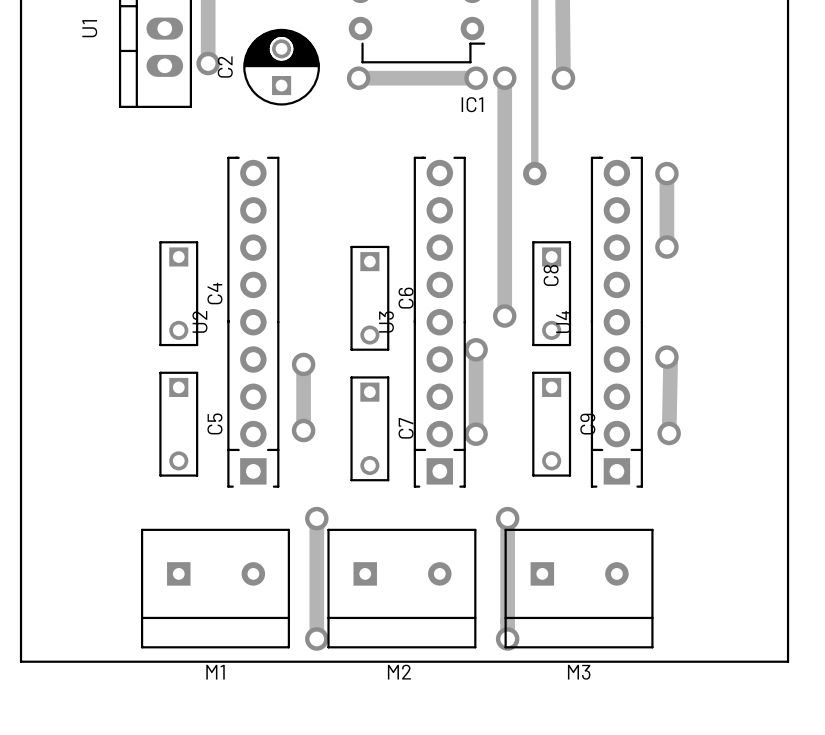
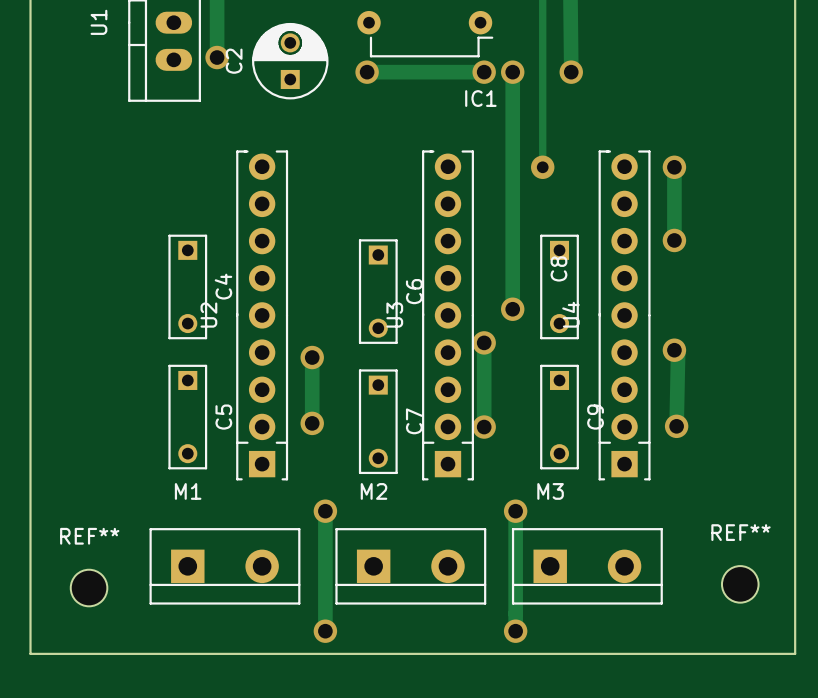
M1 footprint: [140, 528, 290, 649] -> [149, 528, 301, 605]
M2 footprint: [327, 528, 477, 649] -> [335, 528, 487, 605]
M3 footprint: [504, 528, 654, 649] -> [511, 528, 663, 605]
REF**: none -> (740, 584)
REF**: none -> (89, 588)
M1 name position: M1 (215, 672) -> M1 (188, 491)
M2 name position: M2 (399, 672) -> M2 (374, 491)
M3 name position: M3 (579, 672) -> M3 (550, 491)

